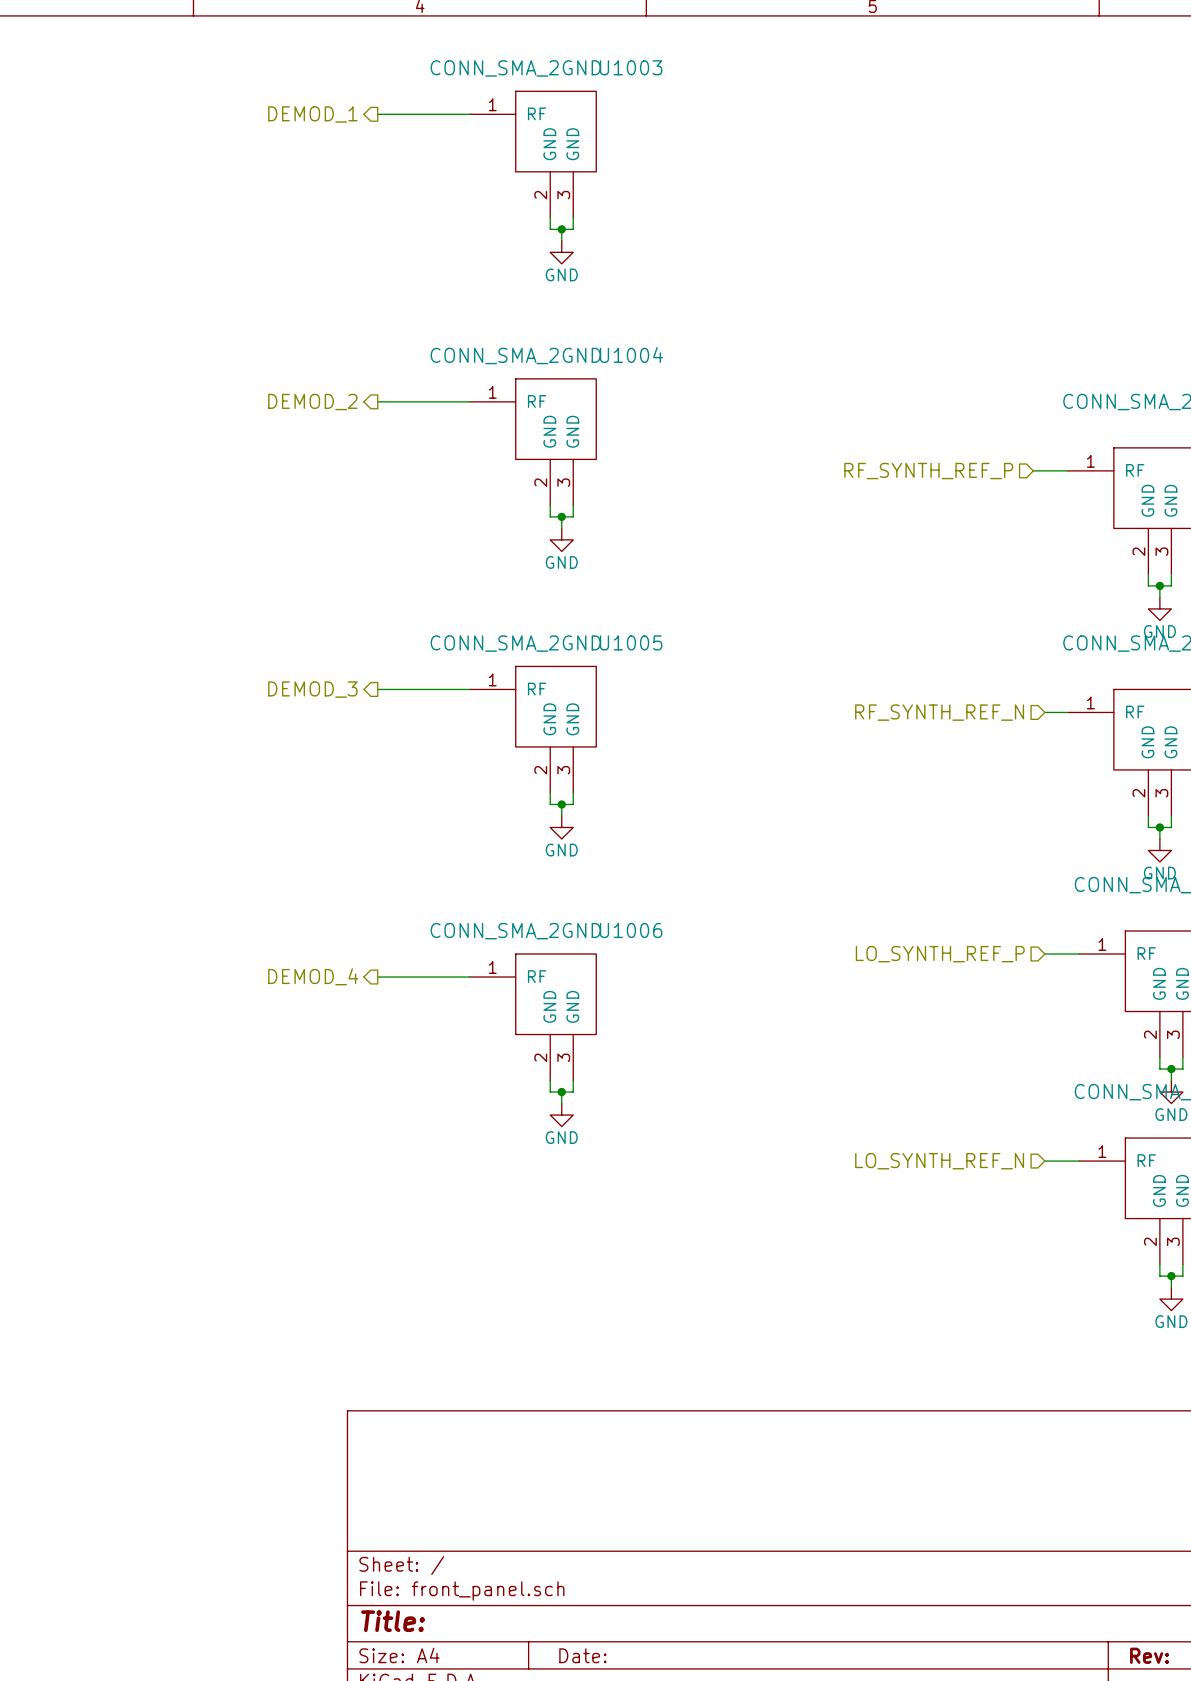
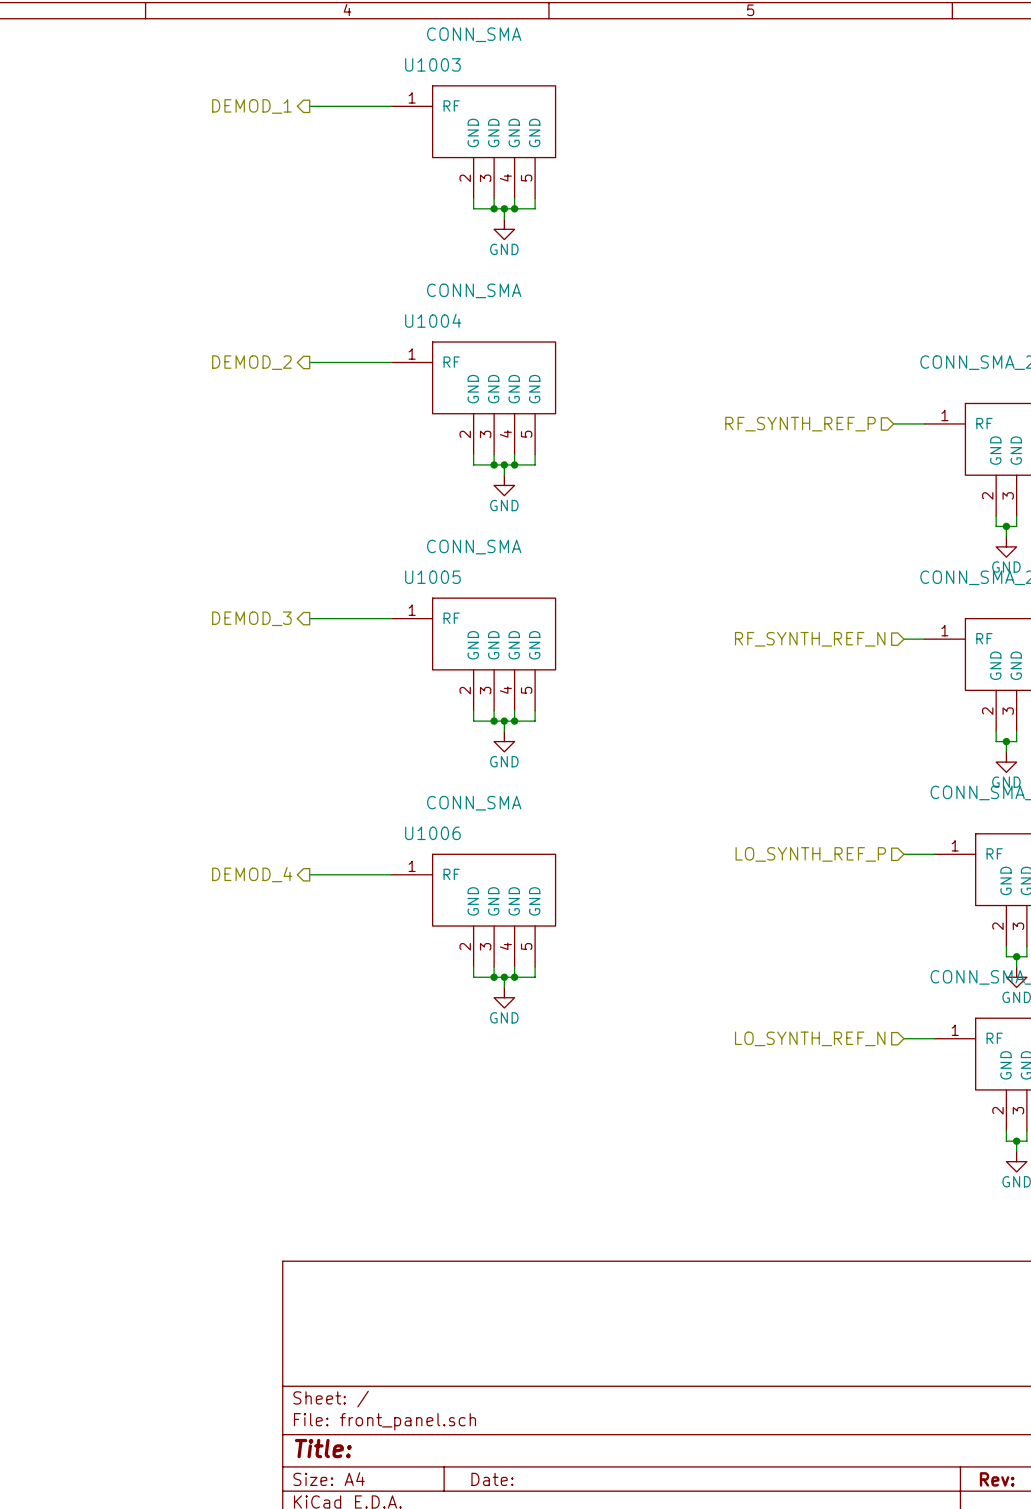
U1003 name position: U1003 (631, 67) -> U1003 (432, 64)
U1003 value: CONN_SMA_2GND (515, 68) -> CONN_SMA (474, 34)
U1003 symbol: [469, 91, 597, 218] -> [391, 85, 556, 199]
wire: (550, 217) (550, 229) (561, 229) (561, 240) -> none
wire: none -> (473, 198) (473, 208)
wire: (573, 217) (573, 229) -> (535, 198) (535, 208) (483, 208)
wire: none -> (494, 198) (494, 208)
wire: none -> (514, 198) (514, 208)
junction: (561, 229) -> none
junction: none -> (494, 208)
wire: none -> (504, 208) (504, 219)
junction: none -> (504, 208)
junction: none -> (514, 208)
power symbol position: GND (561, 252) -> GND (504, 229)
U1004 name position: U1004 (631, 355) -> U1004 (433, 320)
U1004 value: CONN_SMA_2GND (515, 356) -> CONN_SMA (474, 290)
U1004 symbol: [469, 378, 597, 506] -> [391, 342, 556, 455]
wire: (550, 505) (550, 516) (561, 516) (561, 528) -> none
wire: none -> (473, 454) (473, 464)
wire: (573, 505) (573, 516) -> (535, 454) (535, 464) (483, 464)
wire: none -> (494, 454) (494, 464)
wire: none -> (514, 454) (514, 464)
junction: (561, 516) -> none
junction: none -> (494, 464)
wire: none -> (504, 464) (504, 475)
junction: none -> (504, 464)
junction: none -> (514, 464)
power symbol position: GND (561, 539) -> GND (504, 485)
U1005 name position: U1005 (631, 642) -> U1005 (432, 577)
U1005 value: CONN_SMA_2GND (515, 643) -> CONN_SMA (474, 547)
U1005 symbol: [469, 666, 597, 793] -> [391, 598, 556, 711]
wire: (550, 792) (550, 804) (561, 804) (561, 815) -> none
wire: none -> (473, 710) (473, 721)
wire: (573, 792) (573, 804) -> (535, 710) (535, 721) (483, 721)
wire: none -> (494, 710) (494, 721)
wire: none -> (514, 710) (514, 721)
junction: (561, 804) -> none
junction: none -> (494, 721)
wire: none -> (504, 721) (504, 731)
junction: none -> (504, 721)
junction: none -> (514, 721)
power symbol position: GND (561, 827) -> GND (504, 741)
U1006 name position: U1006 (631, 930) -> U1006 (432, 833)
U1006 value: CONN_SMA_2GND (515, 931) -> CONN_SMA (474, 803)
U1006 symbol: [469, 954, 597, 1081] -> [391, 854, 556, 968]
wire: (550, 1080) (550, 1092) (561, 1092) (561, 1103) -> none
wire: none -> (473, 967) (473, 977)
wire: (573, 1080) (573, 1092) -> (535, 967) (535, 977) (483, 977)
wire: none -> (494, 967) (494, 977)
wire: none -> (514, 967) (514, 977)
junction: (561, 1092) -> none
junction: none -> (494, 977)
wire: none -> (504, 977) (504, 987)
junction: none -> (504, 977)
junction: none -> (514, 977)
power symbol position: GND (561, 1115) -> GND (504, 997)

